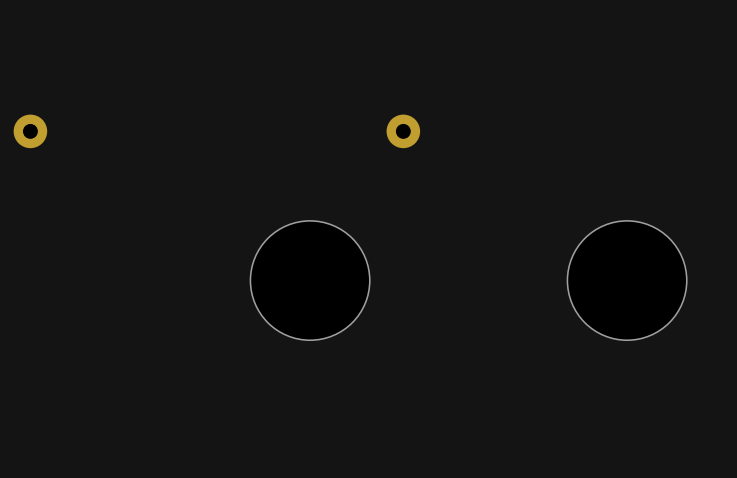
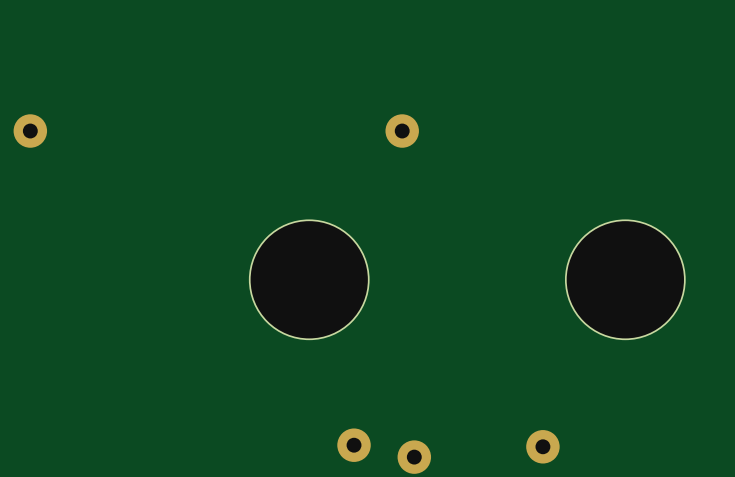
via: none -> (354, 445)
via: none -> (542, 446)
via: none -> (414, 457)

